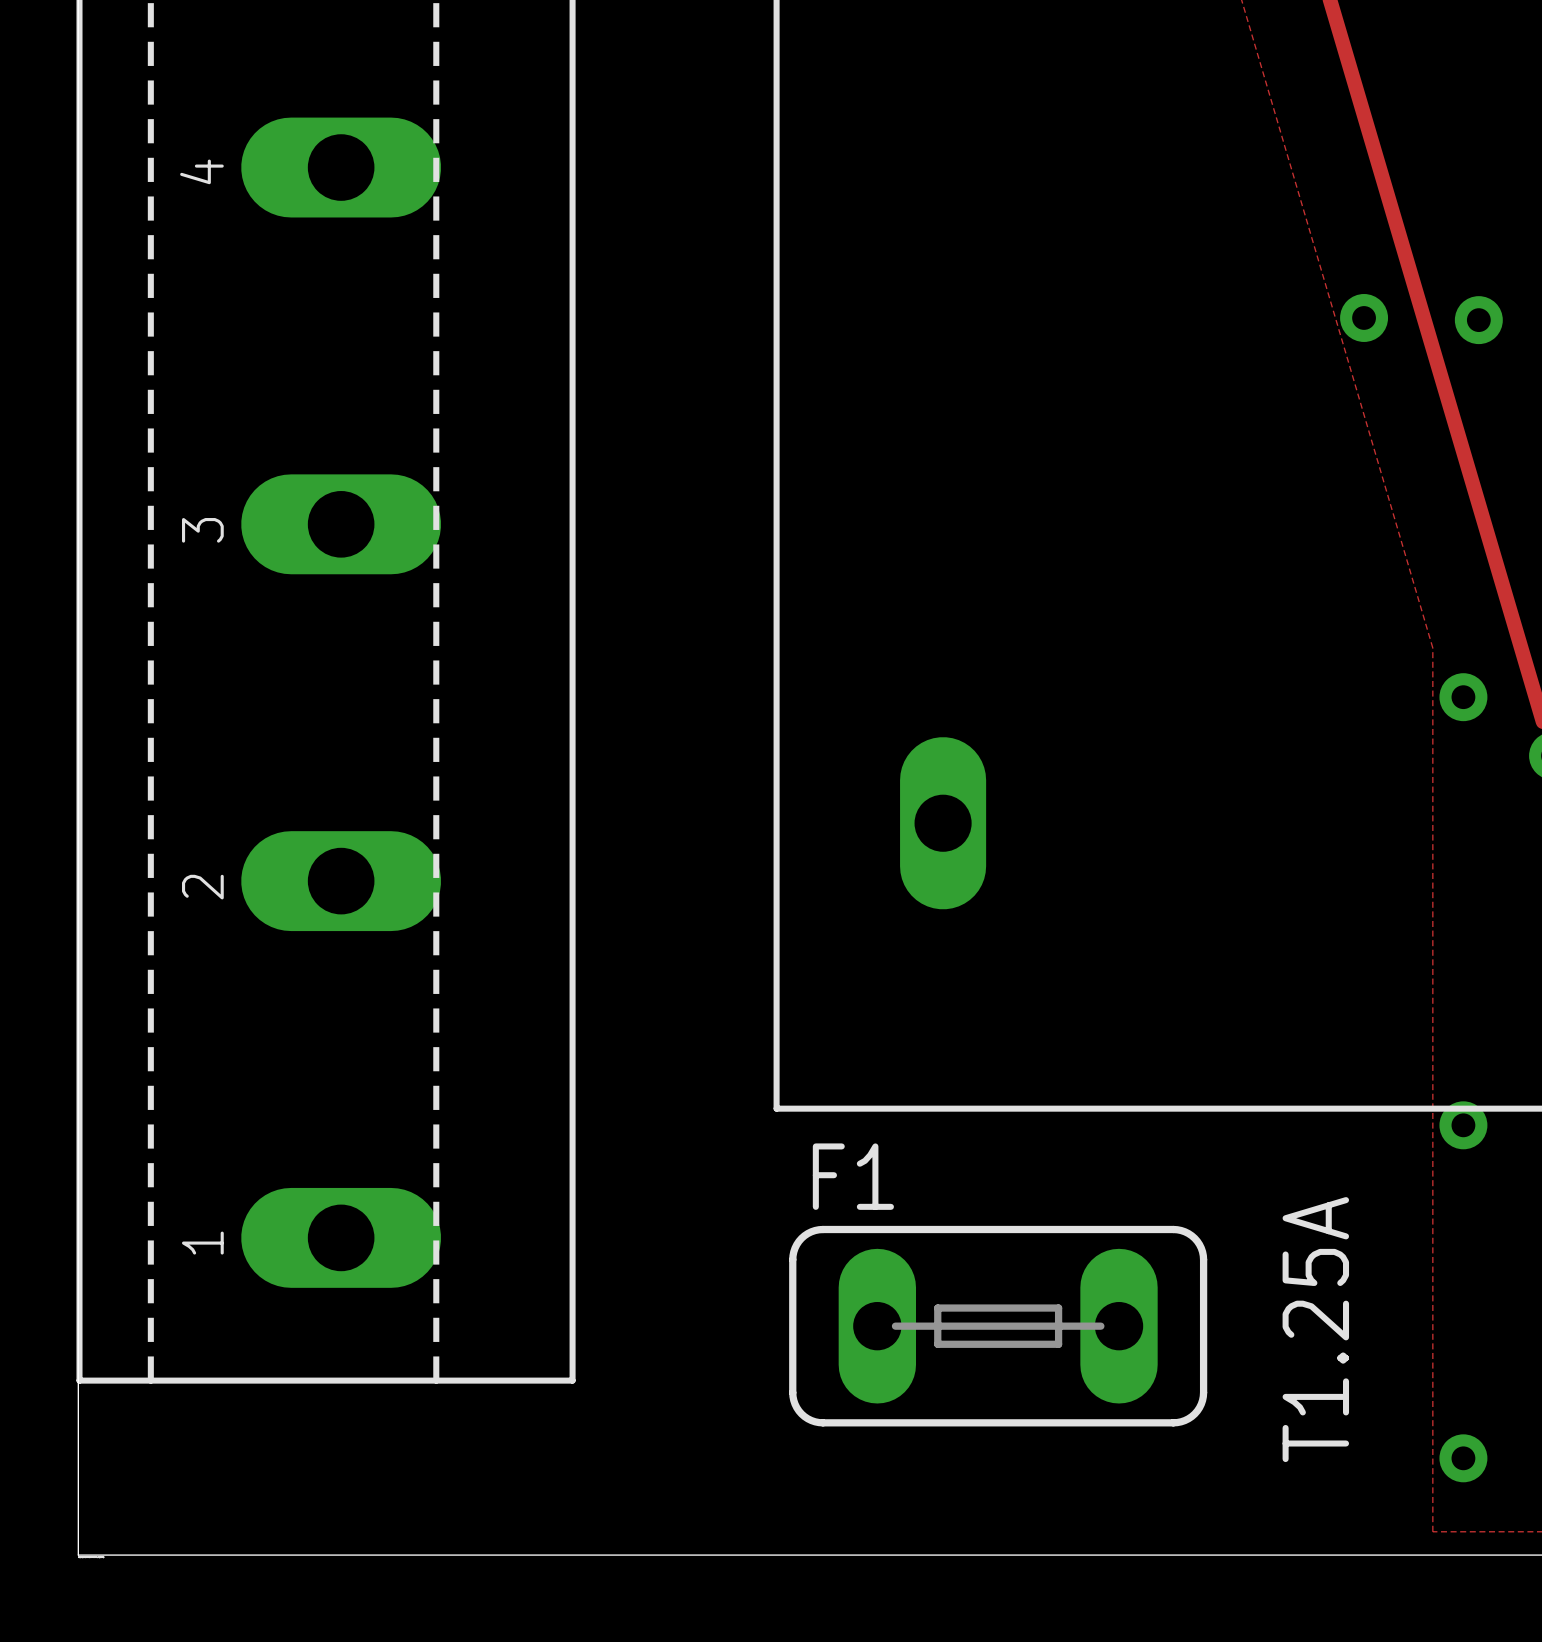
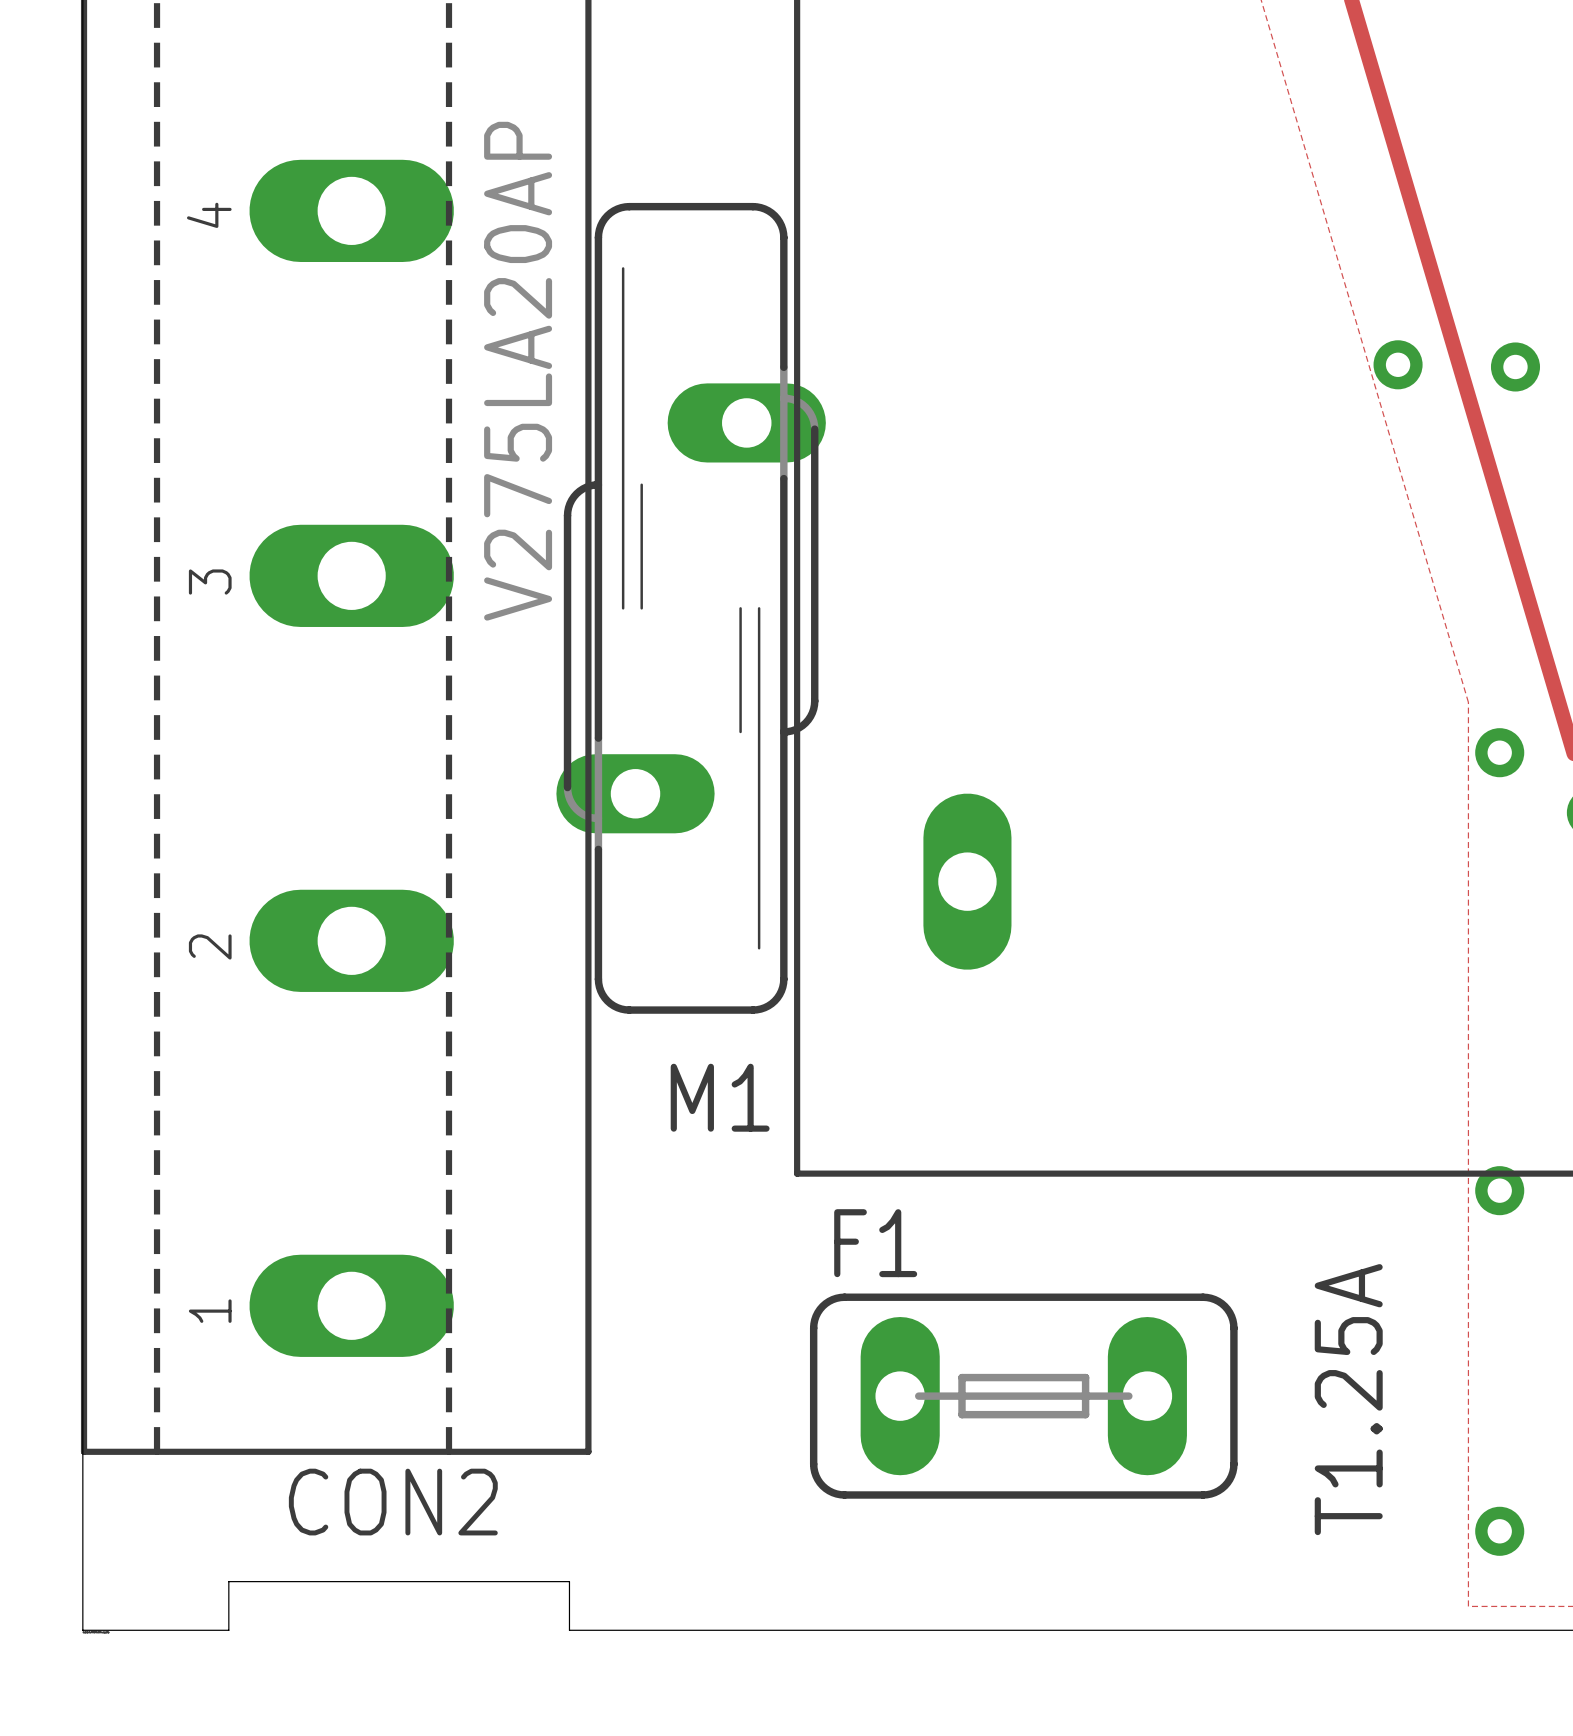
M1: none -> V275LA20AP (691, 608)
text: none -> CON2 (393, 1502)
board edge: (221, 1555) (554, 1555) -> (228, 1630) (228, 1581) (569, 1581) (569, 1630)

